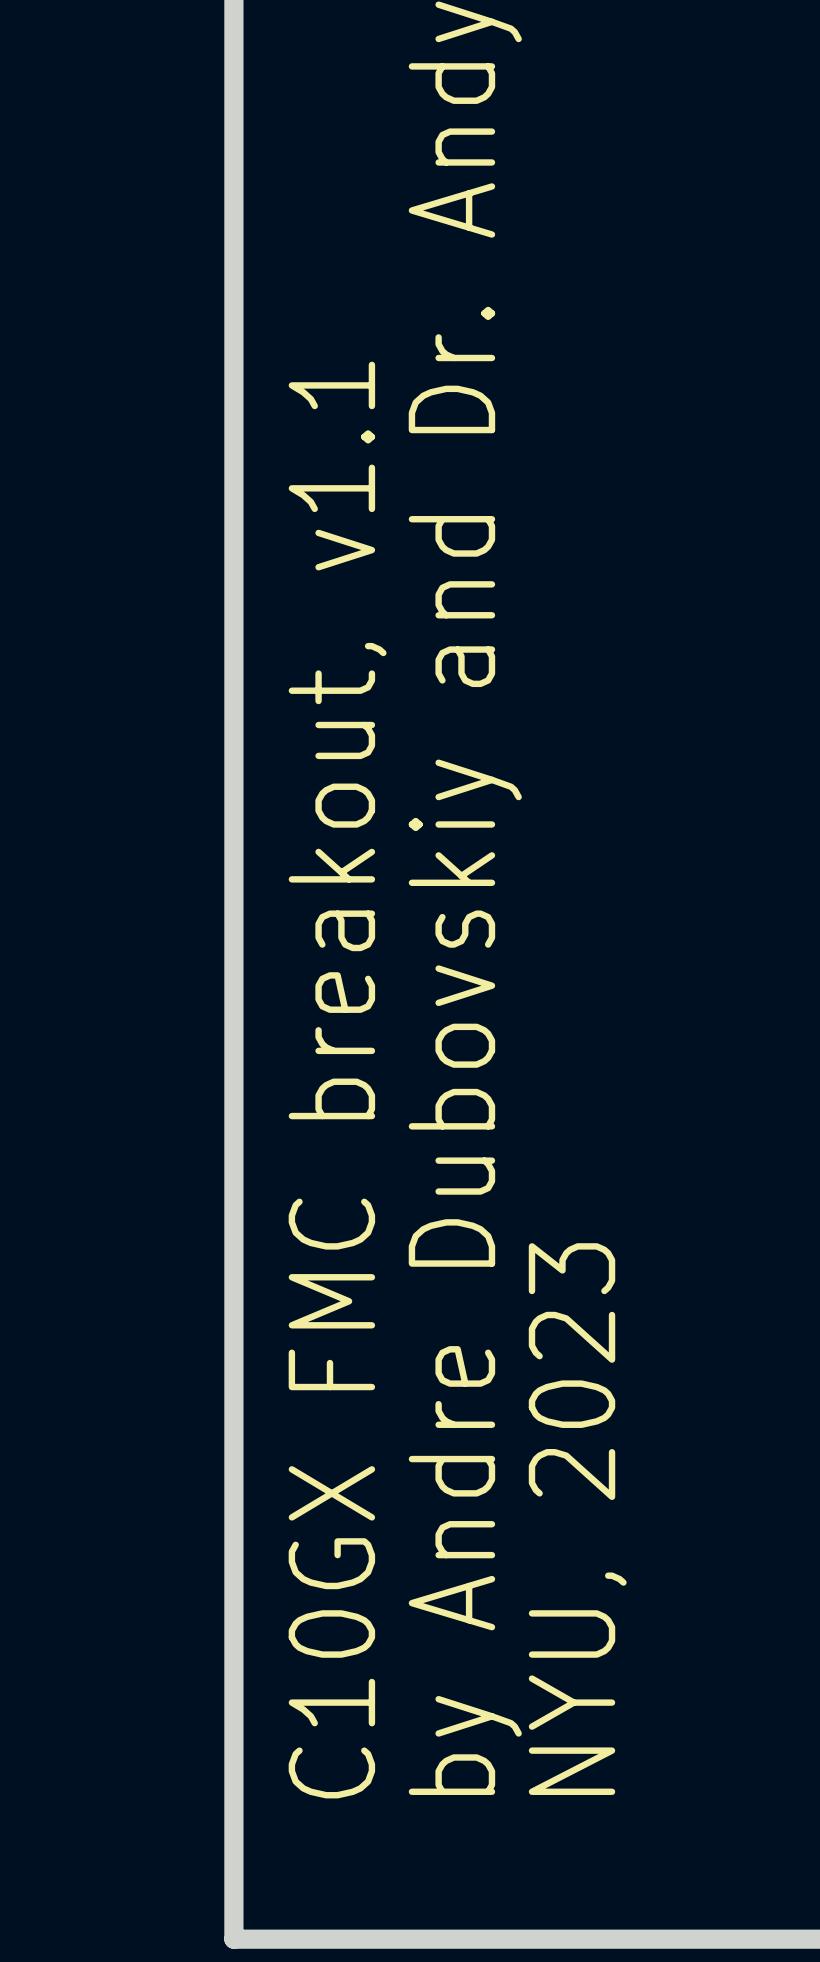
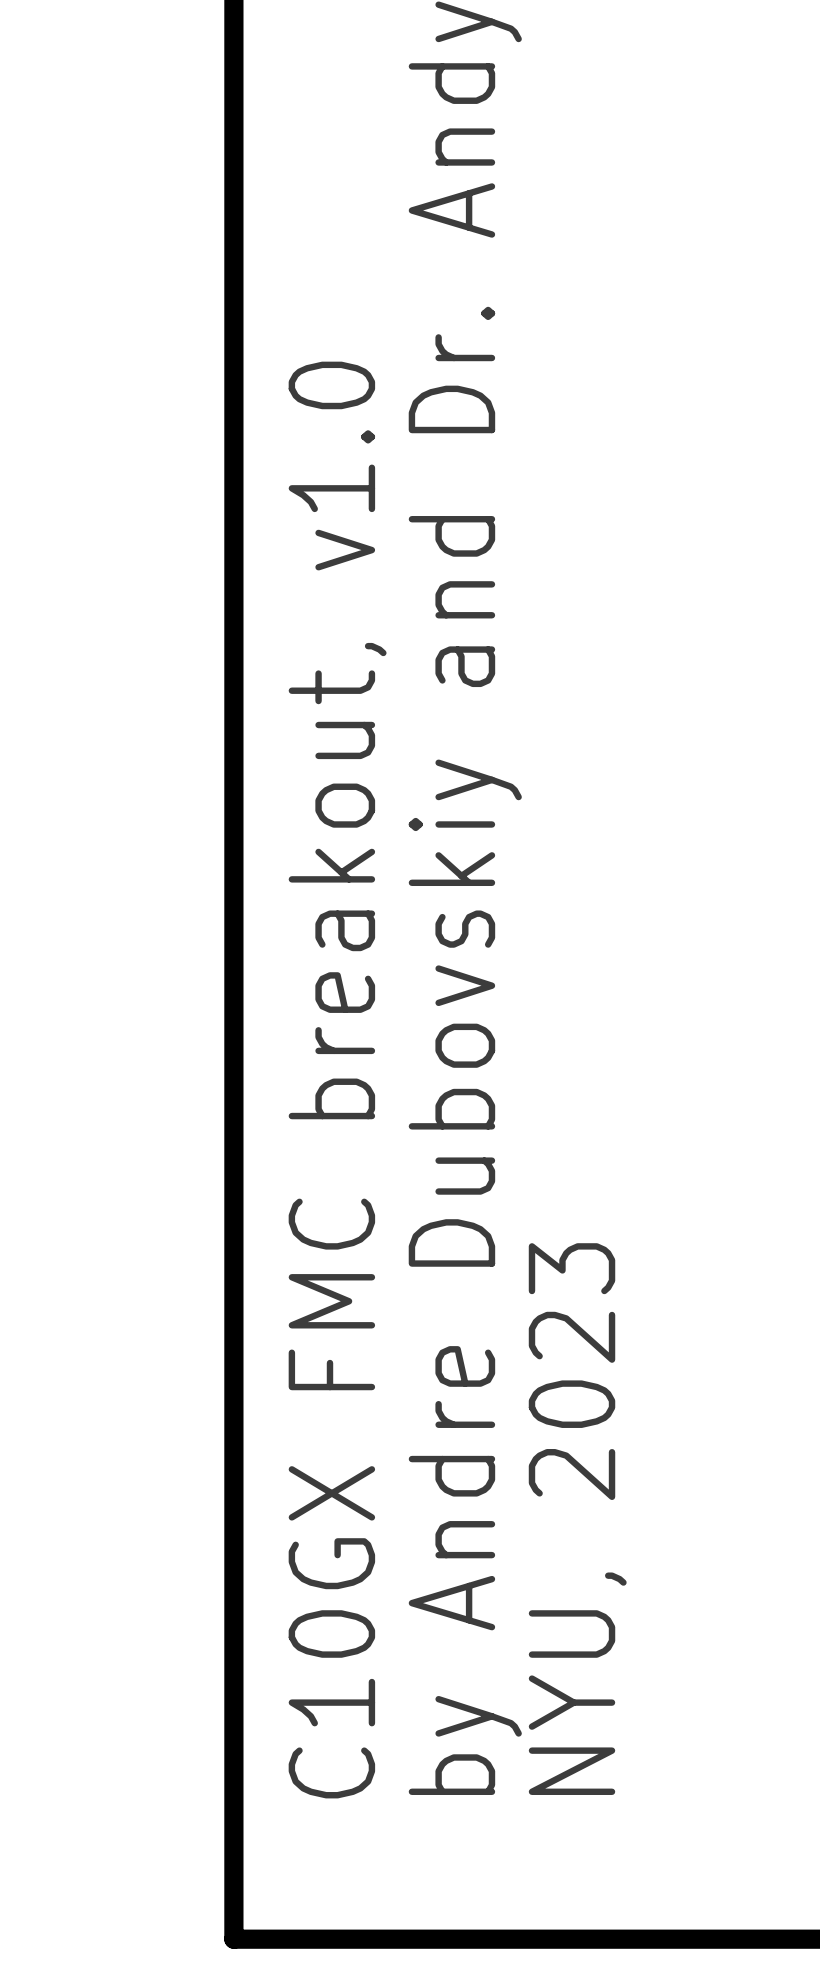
text: C10GX FMC breakout, v1.1 (337, 1080) -> C10GX FMC breakout, v1.0 (337, 1080)

